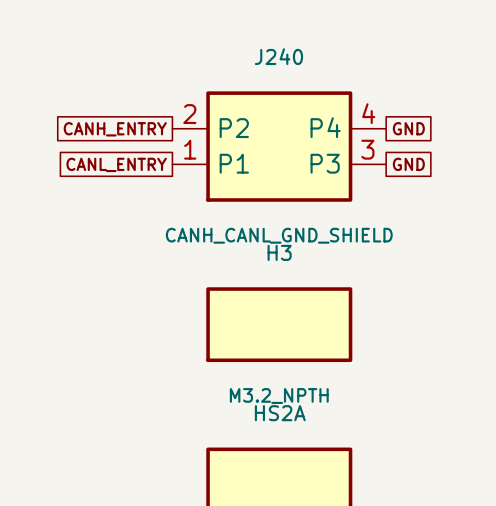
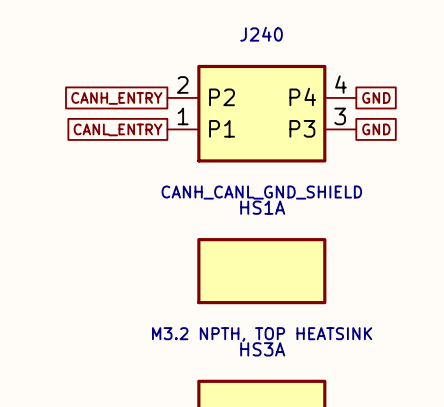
H3 name: H3 (279, 252) -> HS1A (262, 207)
H3 value: M3.2_NPTH (279, 396) -> M3.2 NPTH, TOP HEATSINK (262, 334)
HS2A name: HS2A (280, 413) -> HS3A (262, 349)

